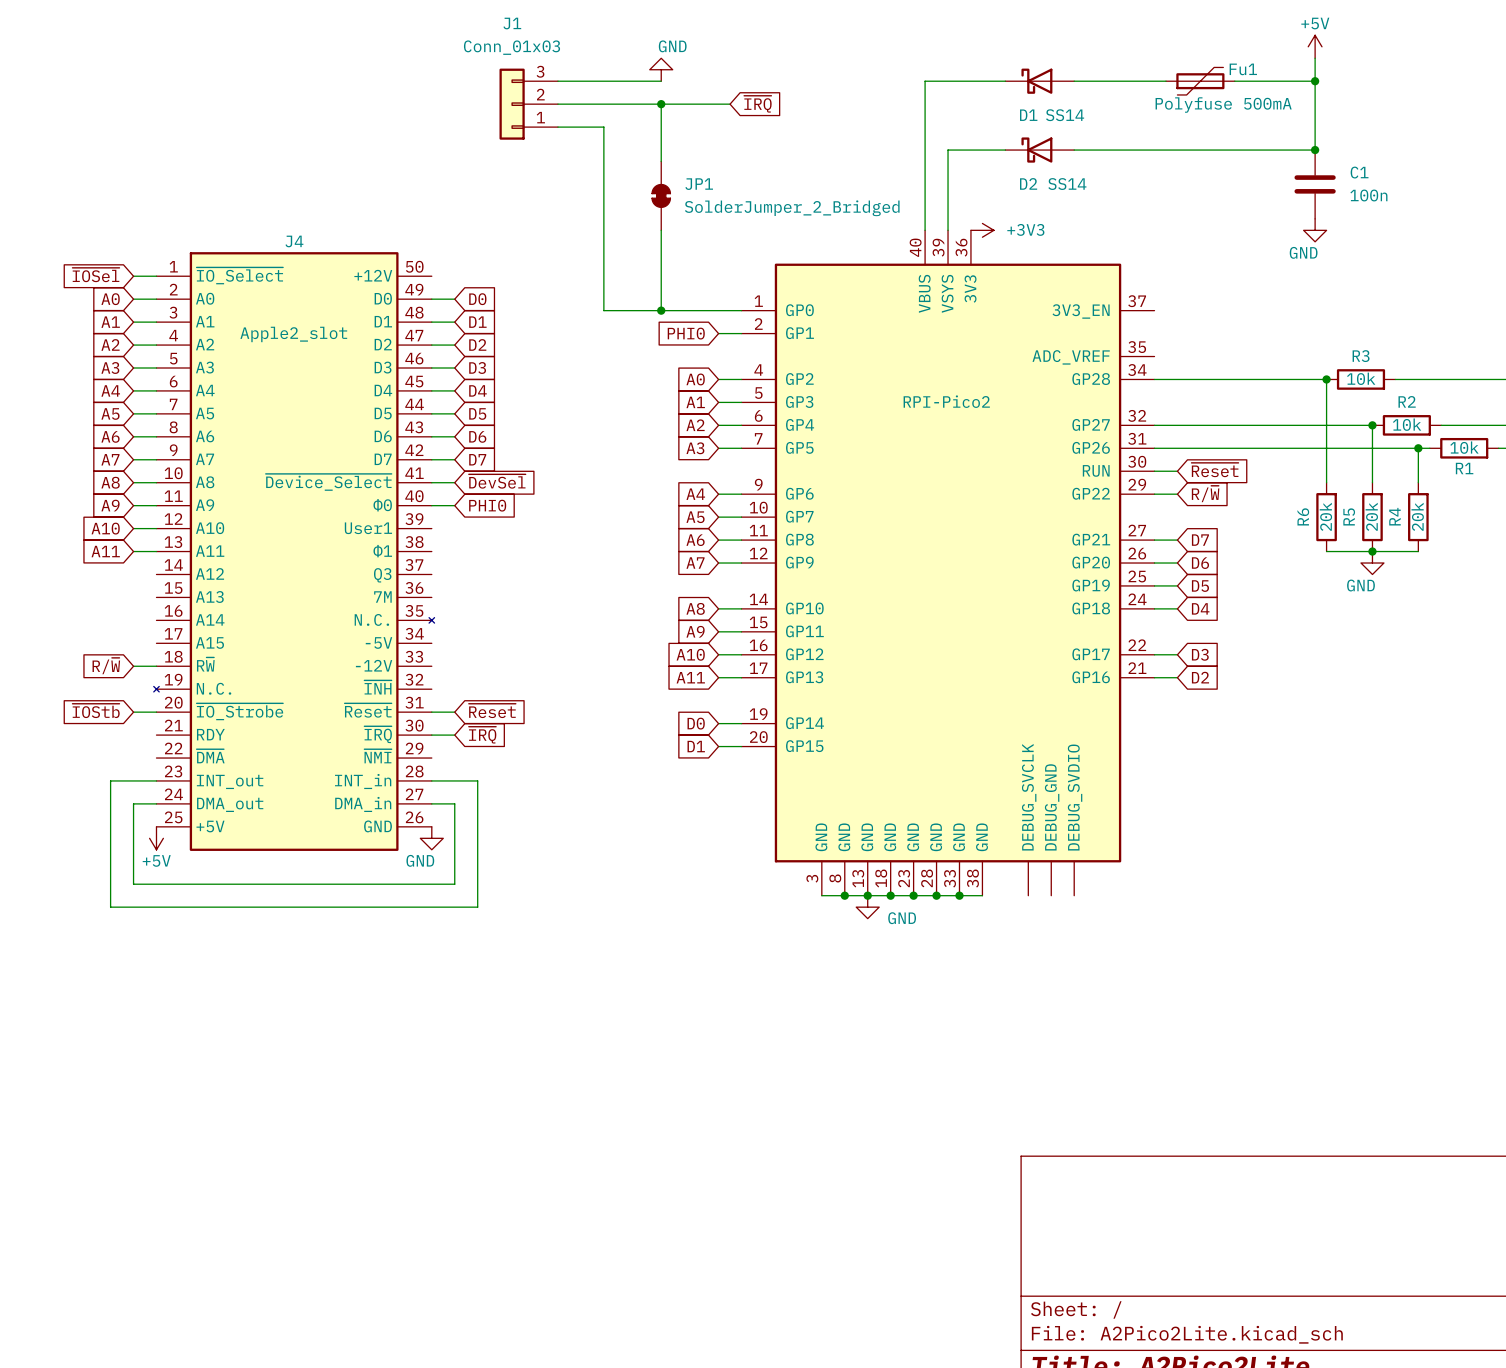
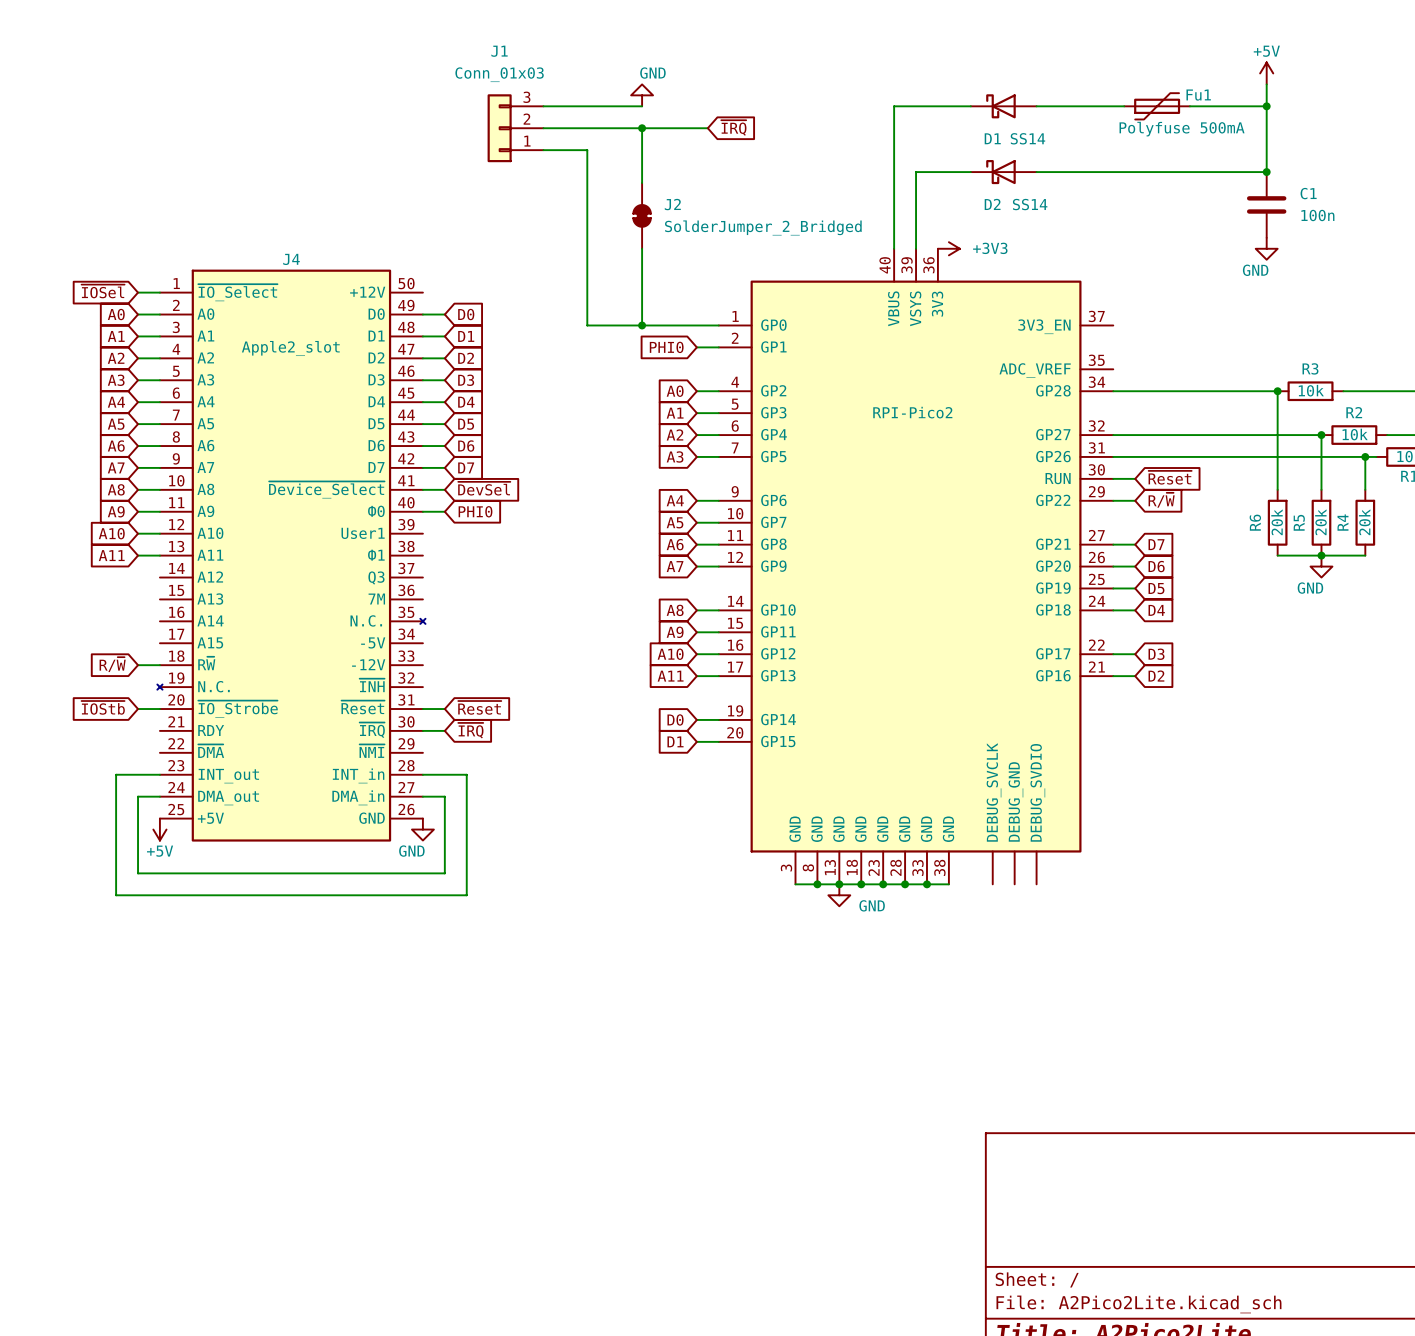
JP1 name: JP1 (699, 184) -> J2 (672, 204)

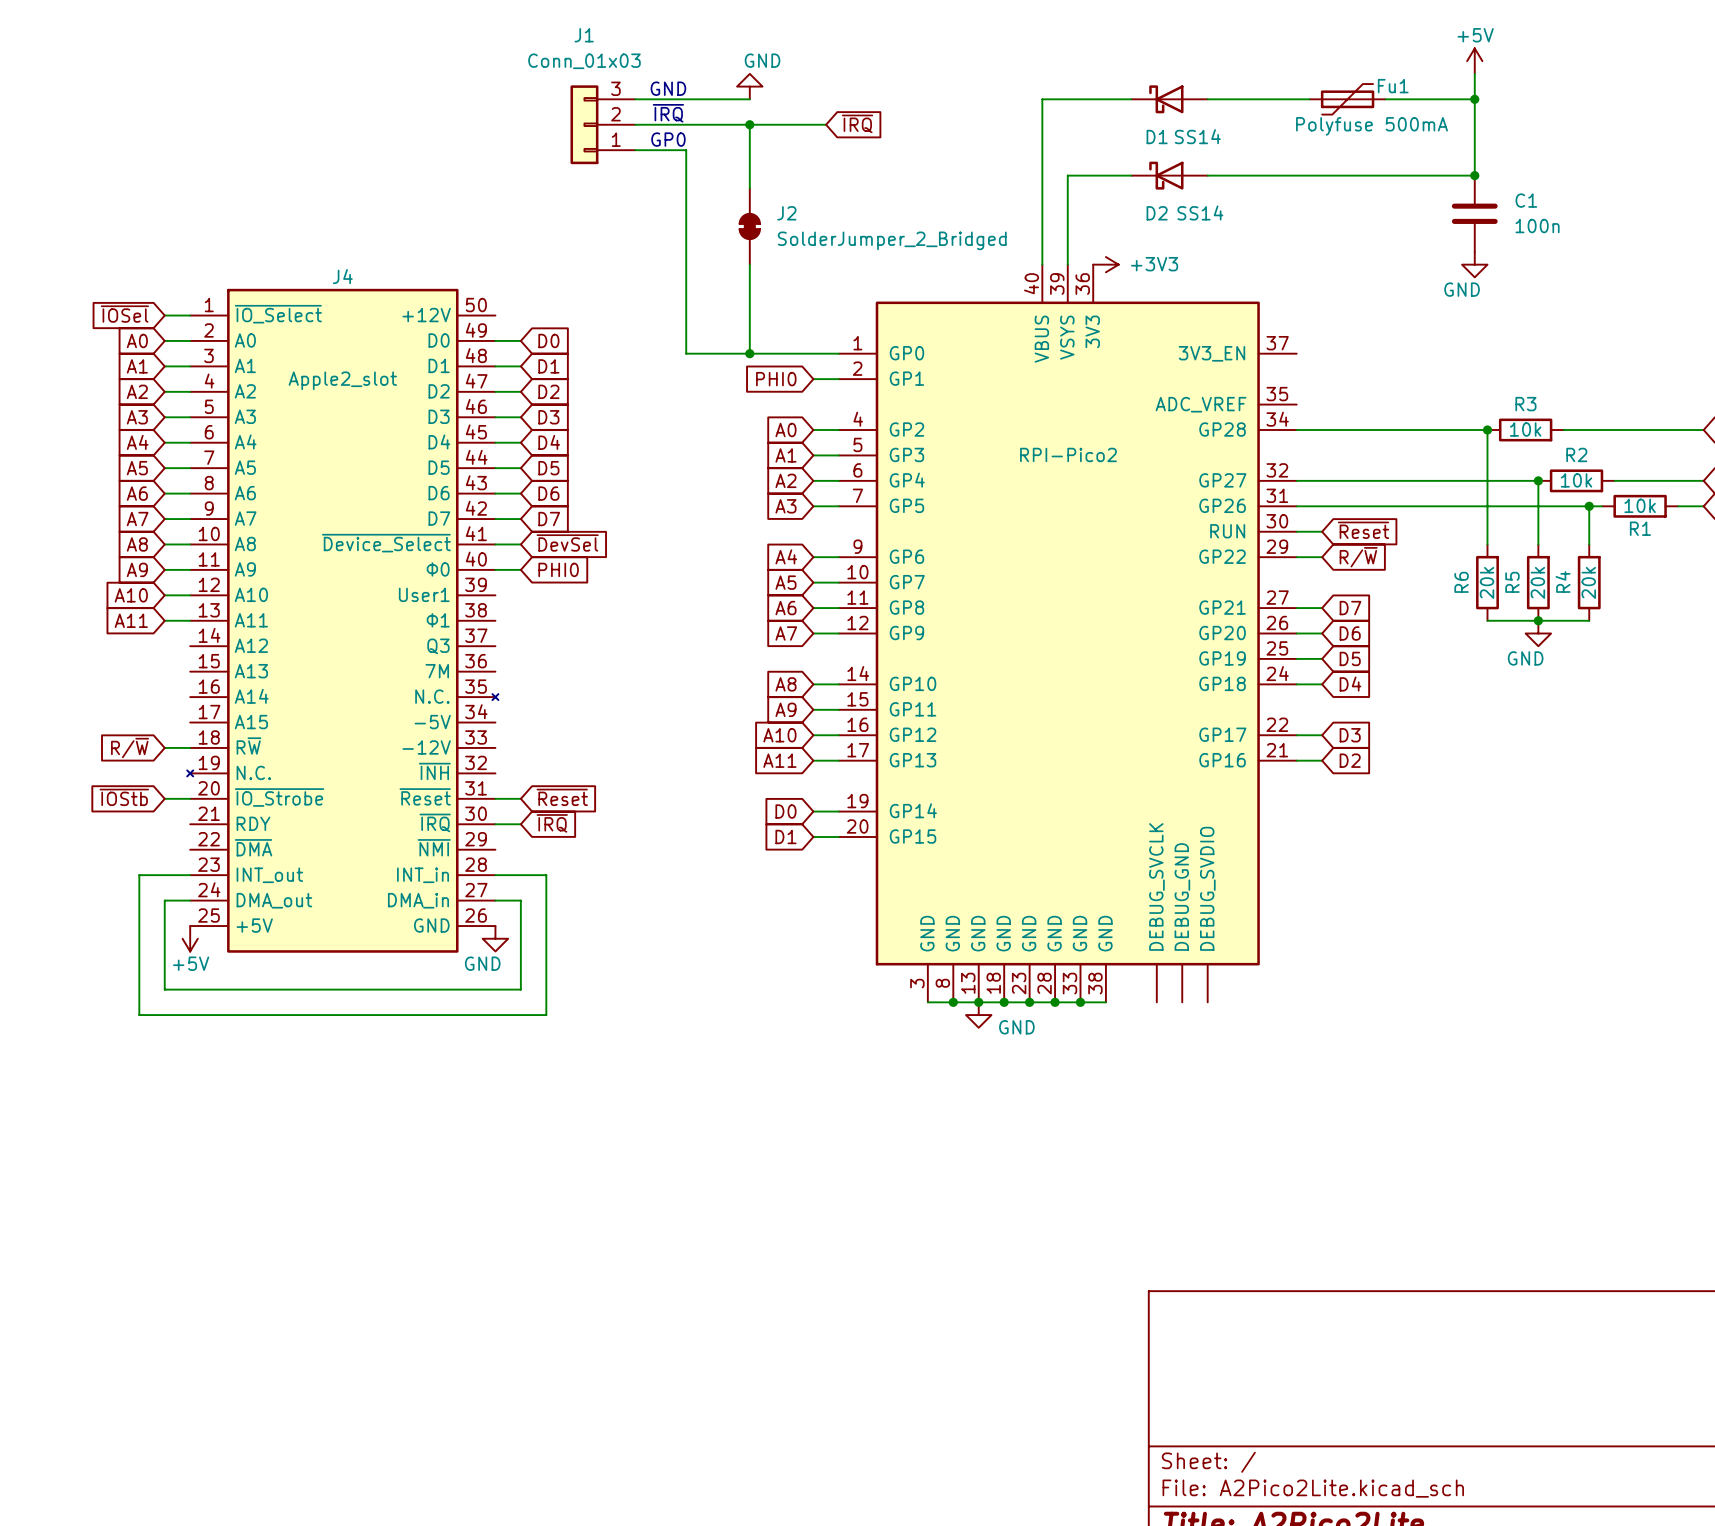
text: none -> GND (668, 88)
text: none -> ~{IRQ} (668, 113)
text: none -> GP0 (668, 139)

